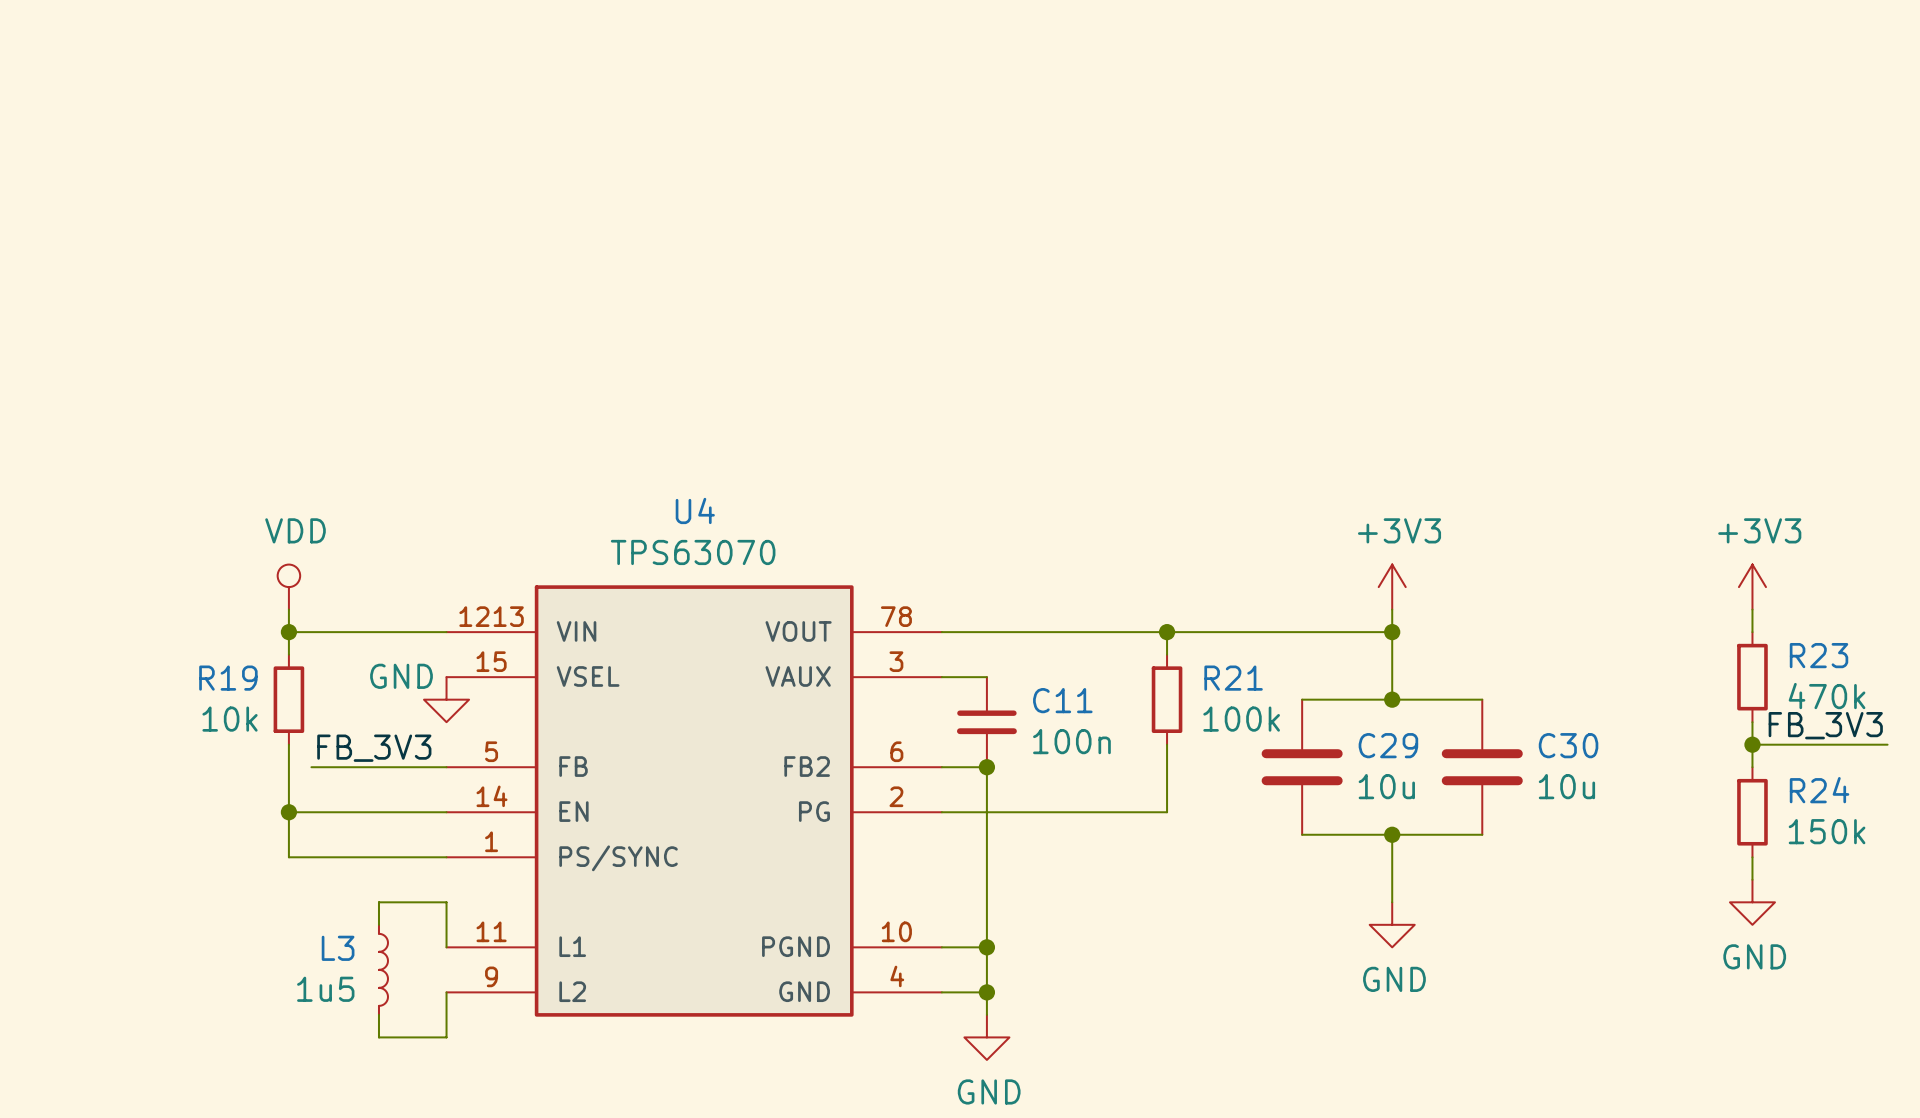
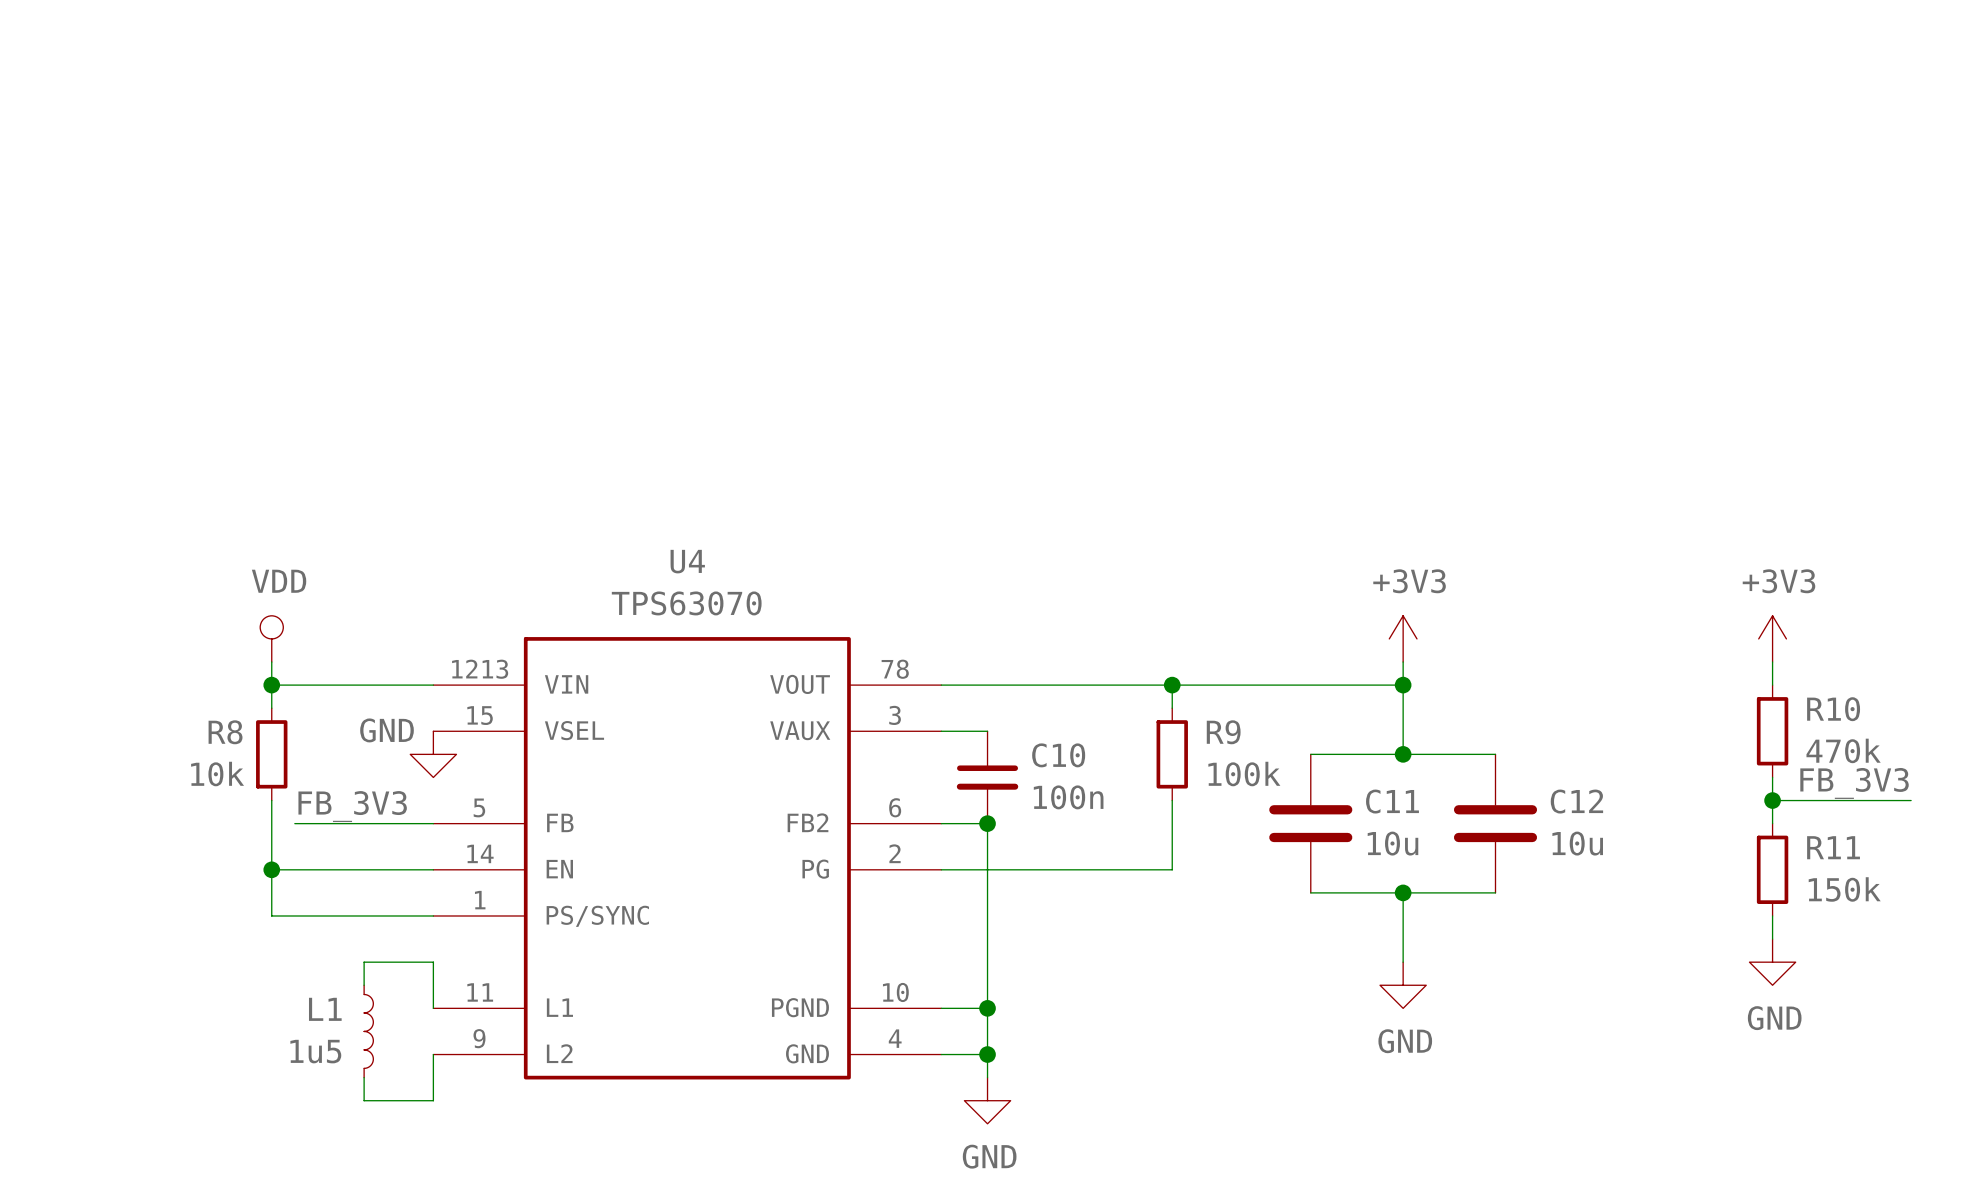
R23 name: R23 (1819, 655) -> R10 (1833, 709)
R19 name: R19 (228, 678) -> R8 (225, 732)
R21 name: R21 (1233, 678) -> R9 (1223, 732)
C11 name: C11 (1062, 700) -> C10 (1058, 755)
C29 name: C29 (1388, 745) -> C11 (1392, 801)
C30 name: C30 (1568, 745) -> C12 (1576, 801)
R24 name: R24 (1819, 790) -> R11 (1833, 847)
L3 name: L3 (338, 948) -> L1 (325, 1009)

